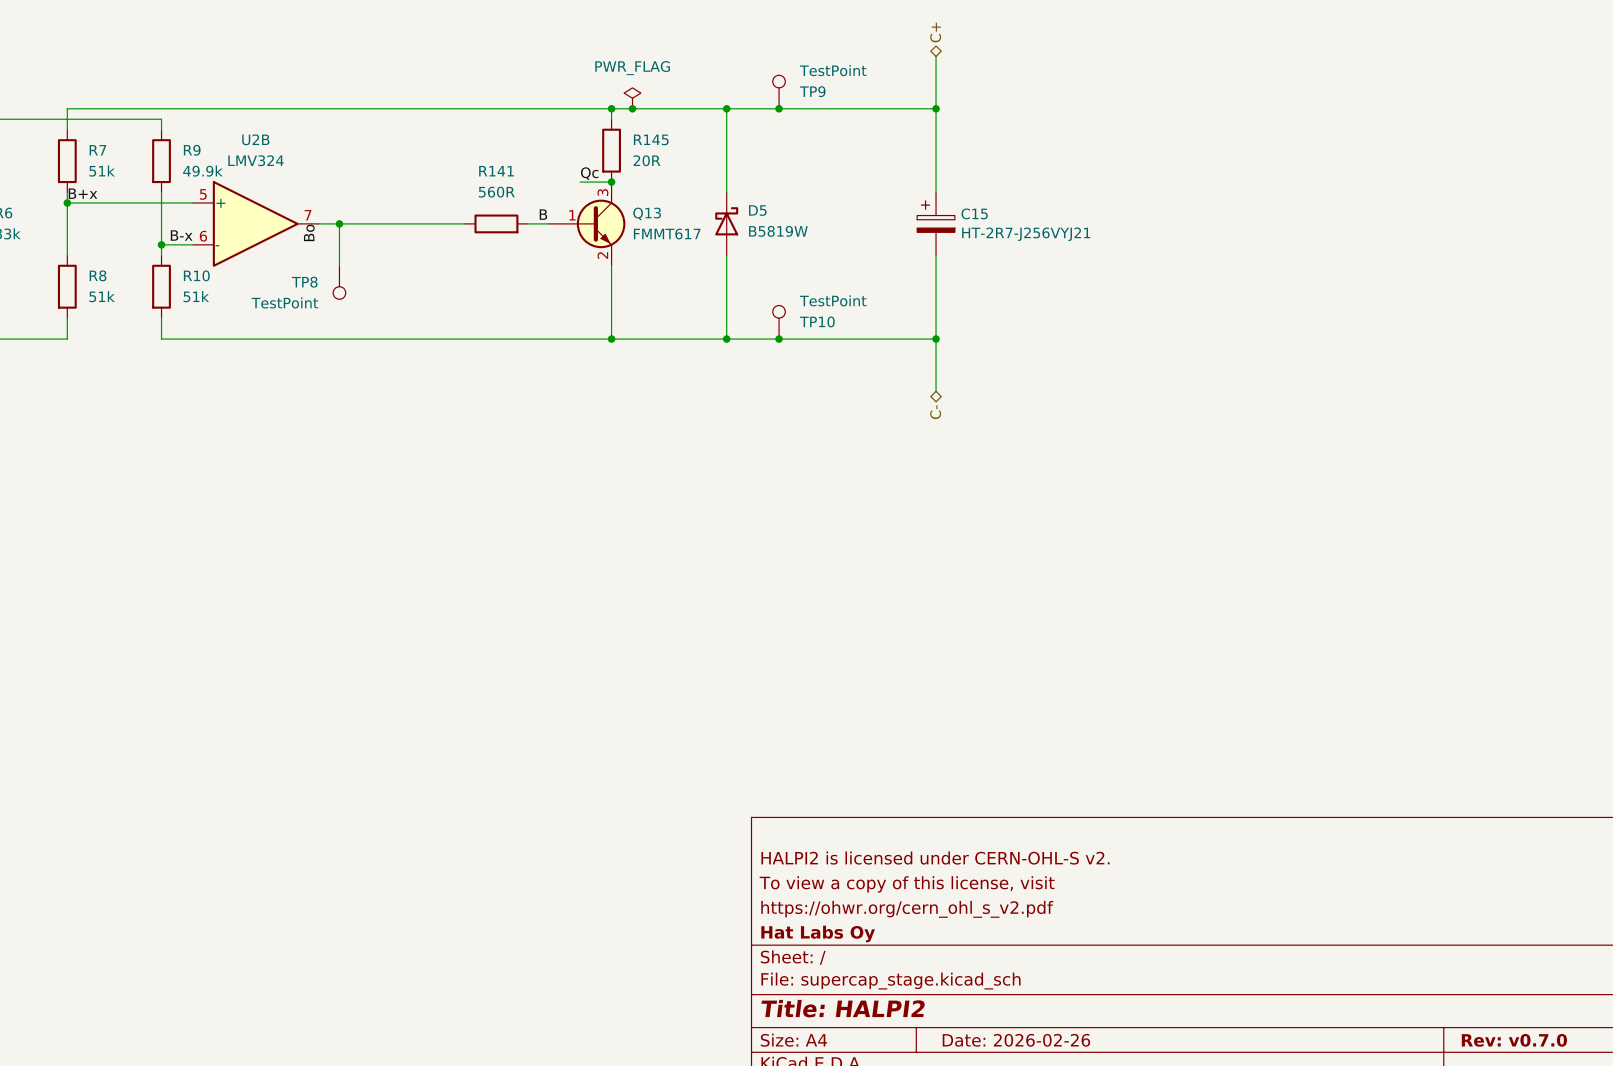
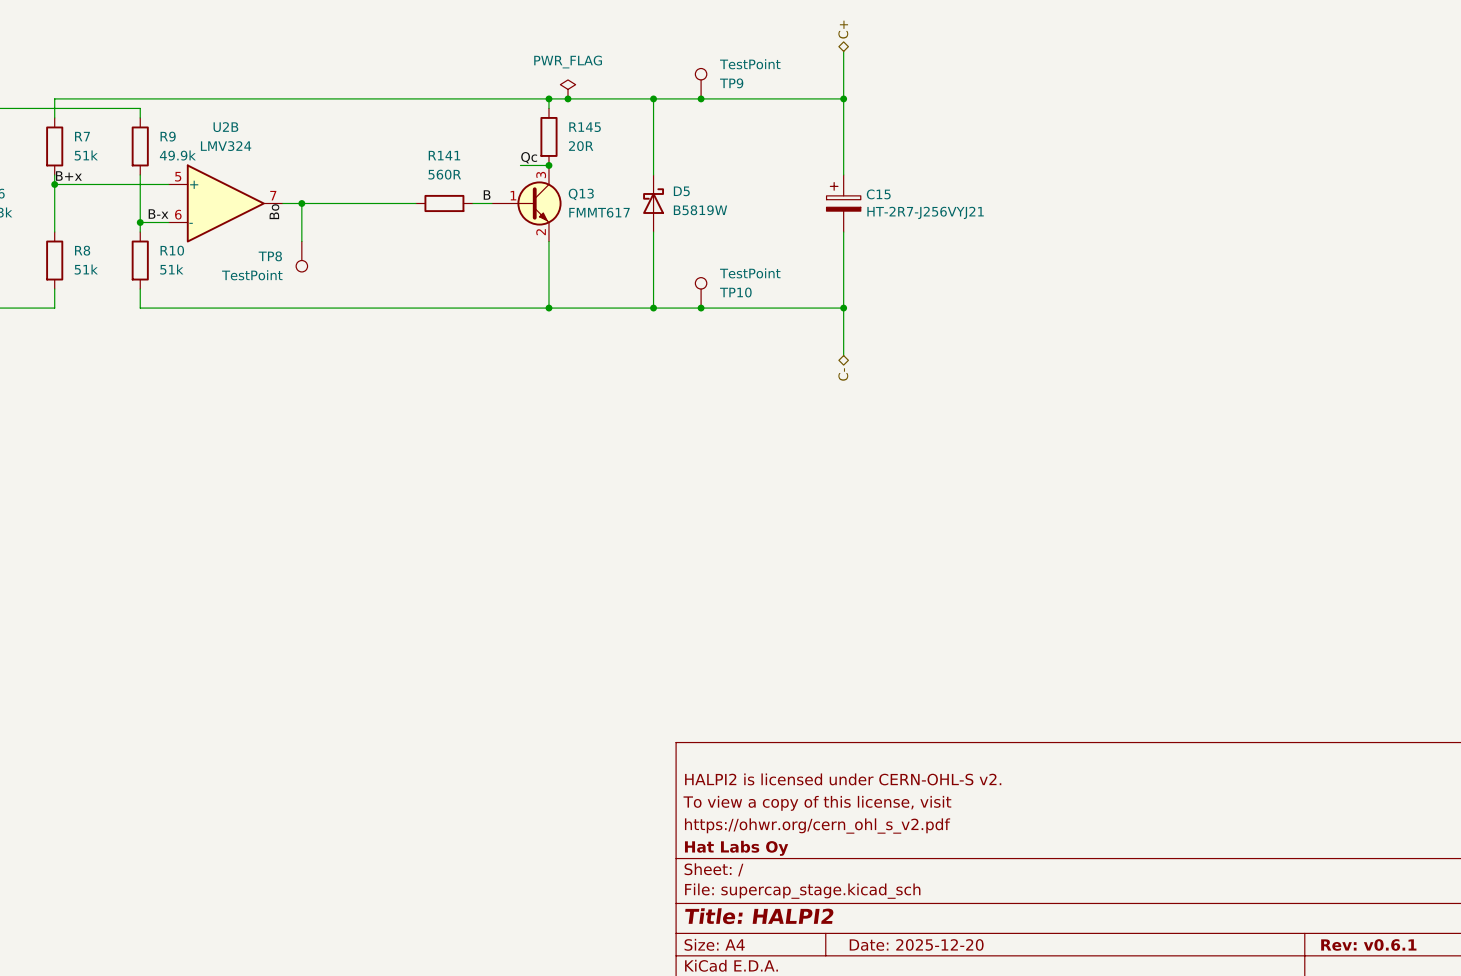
title block: Date: 2026-02-26 (1016, 1040) -> Date: 2025-12-20 (916, 944)
title block: Rev: v0.7.0 (1514, 1040) -> Rev: v0.6.1 (1368, 944)

